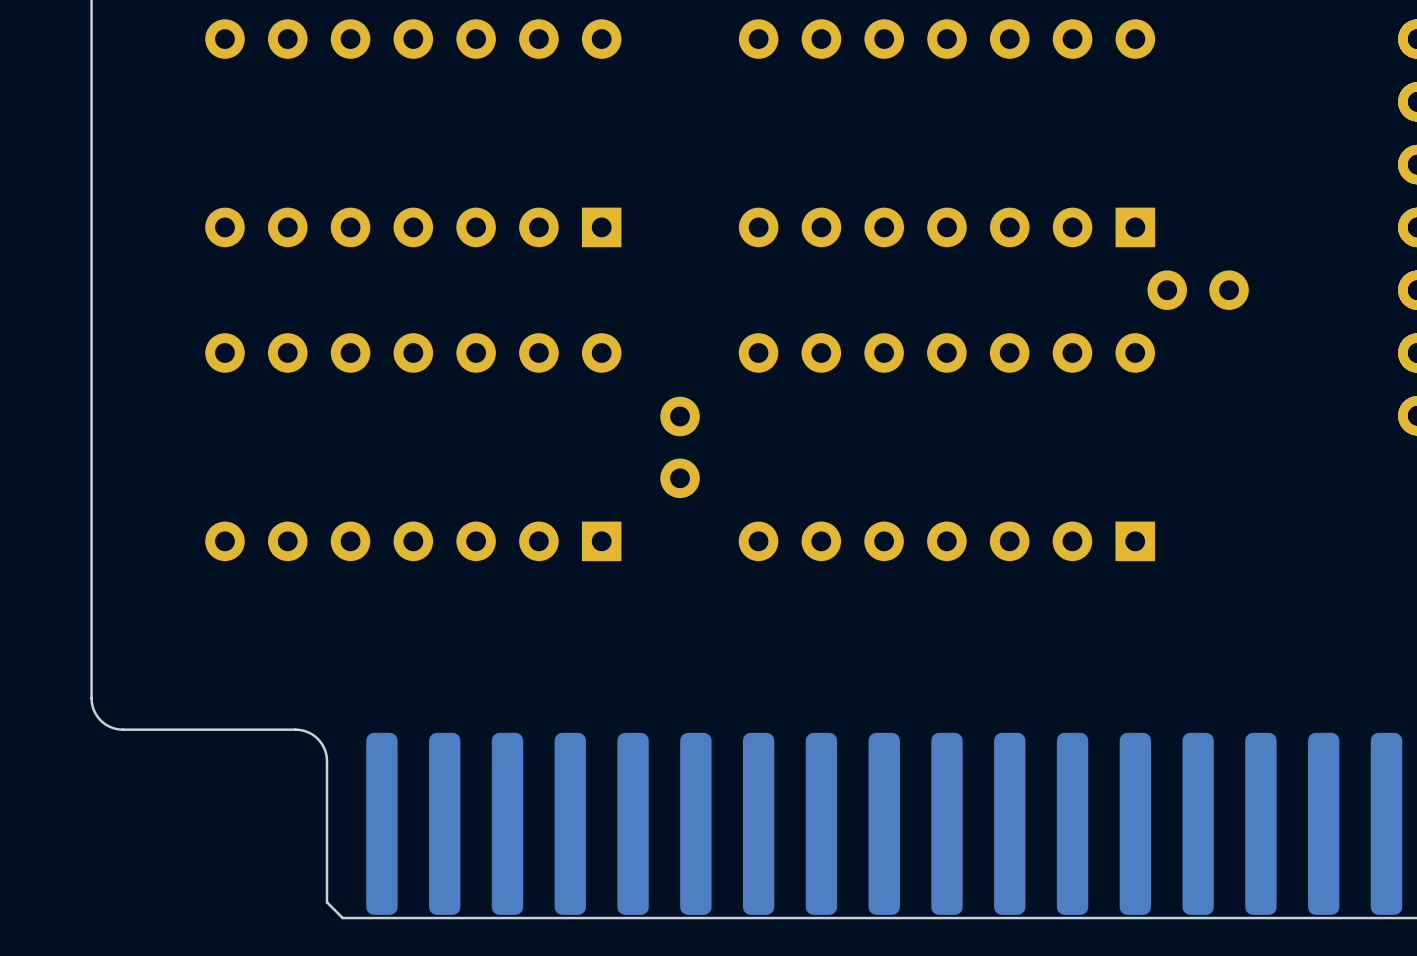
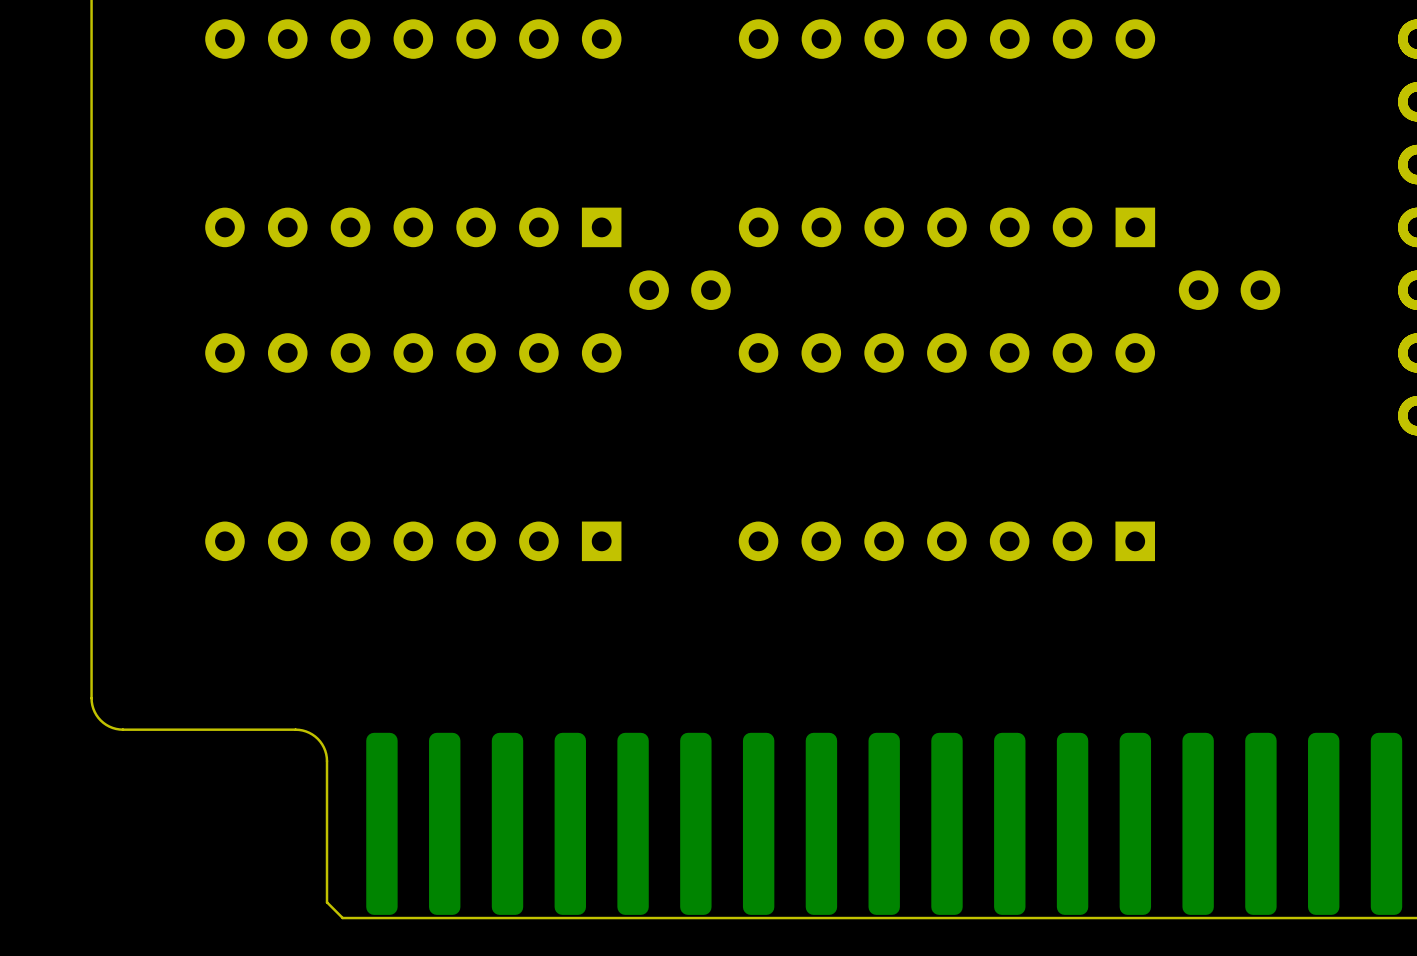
part position: (1198, 290) -> (1229, 290)
part rotation: 0° (680, 447) -> 90° clockwise (680, 290)
part position: (680, 447) -> (680, 290)

